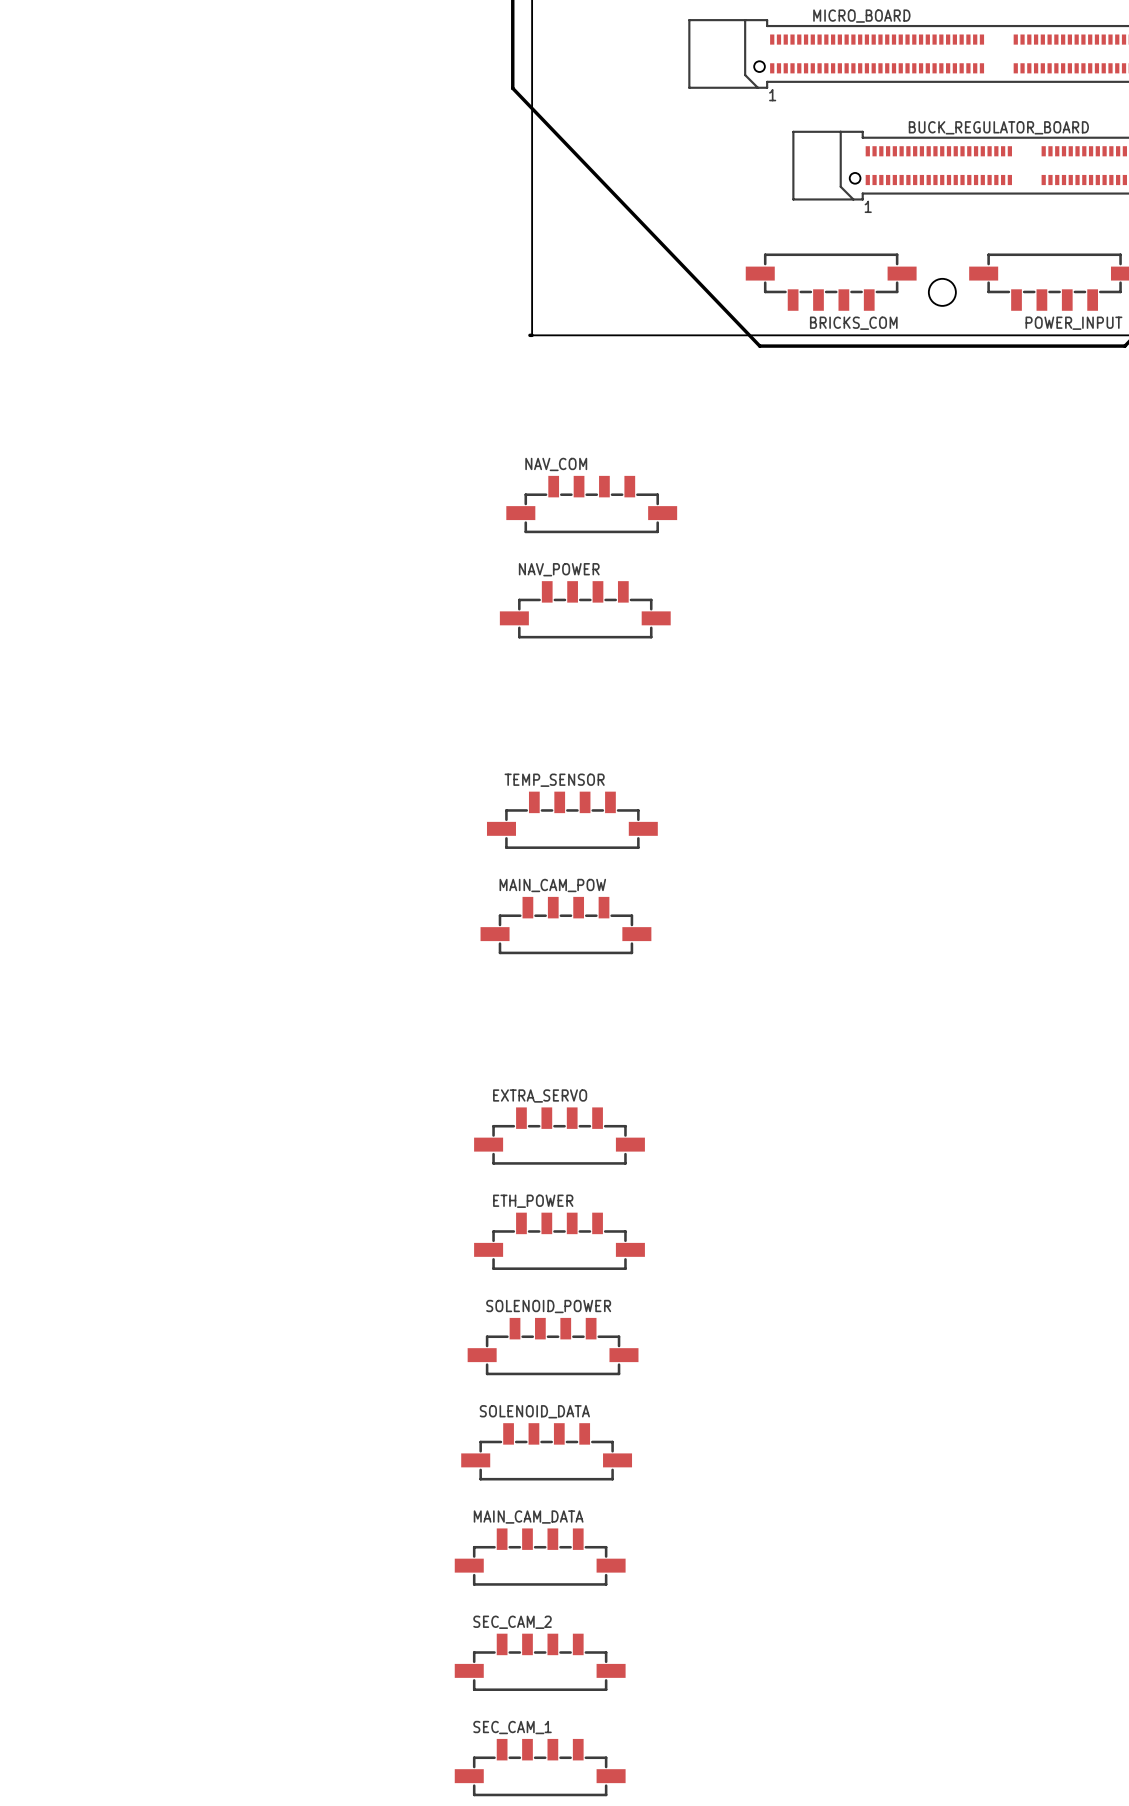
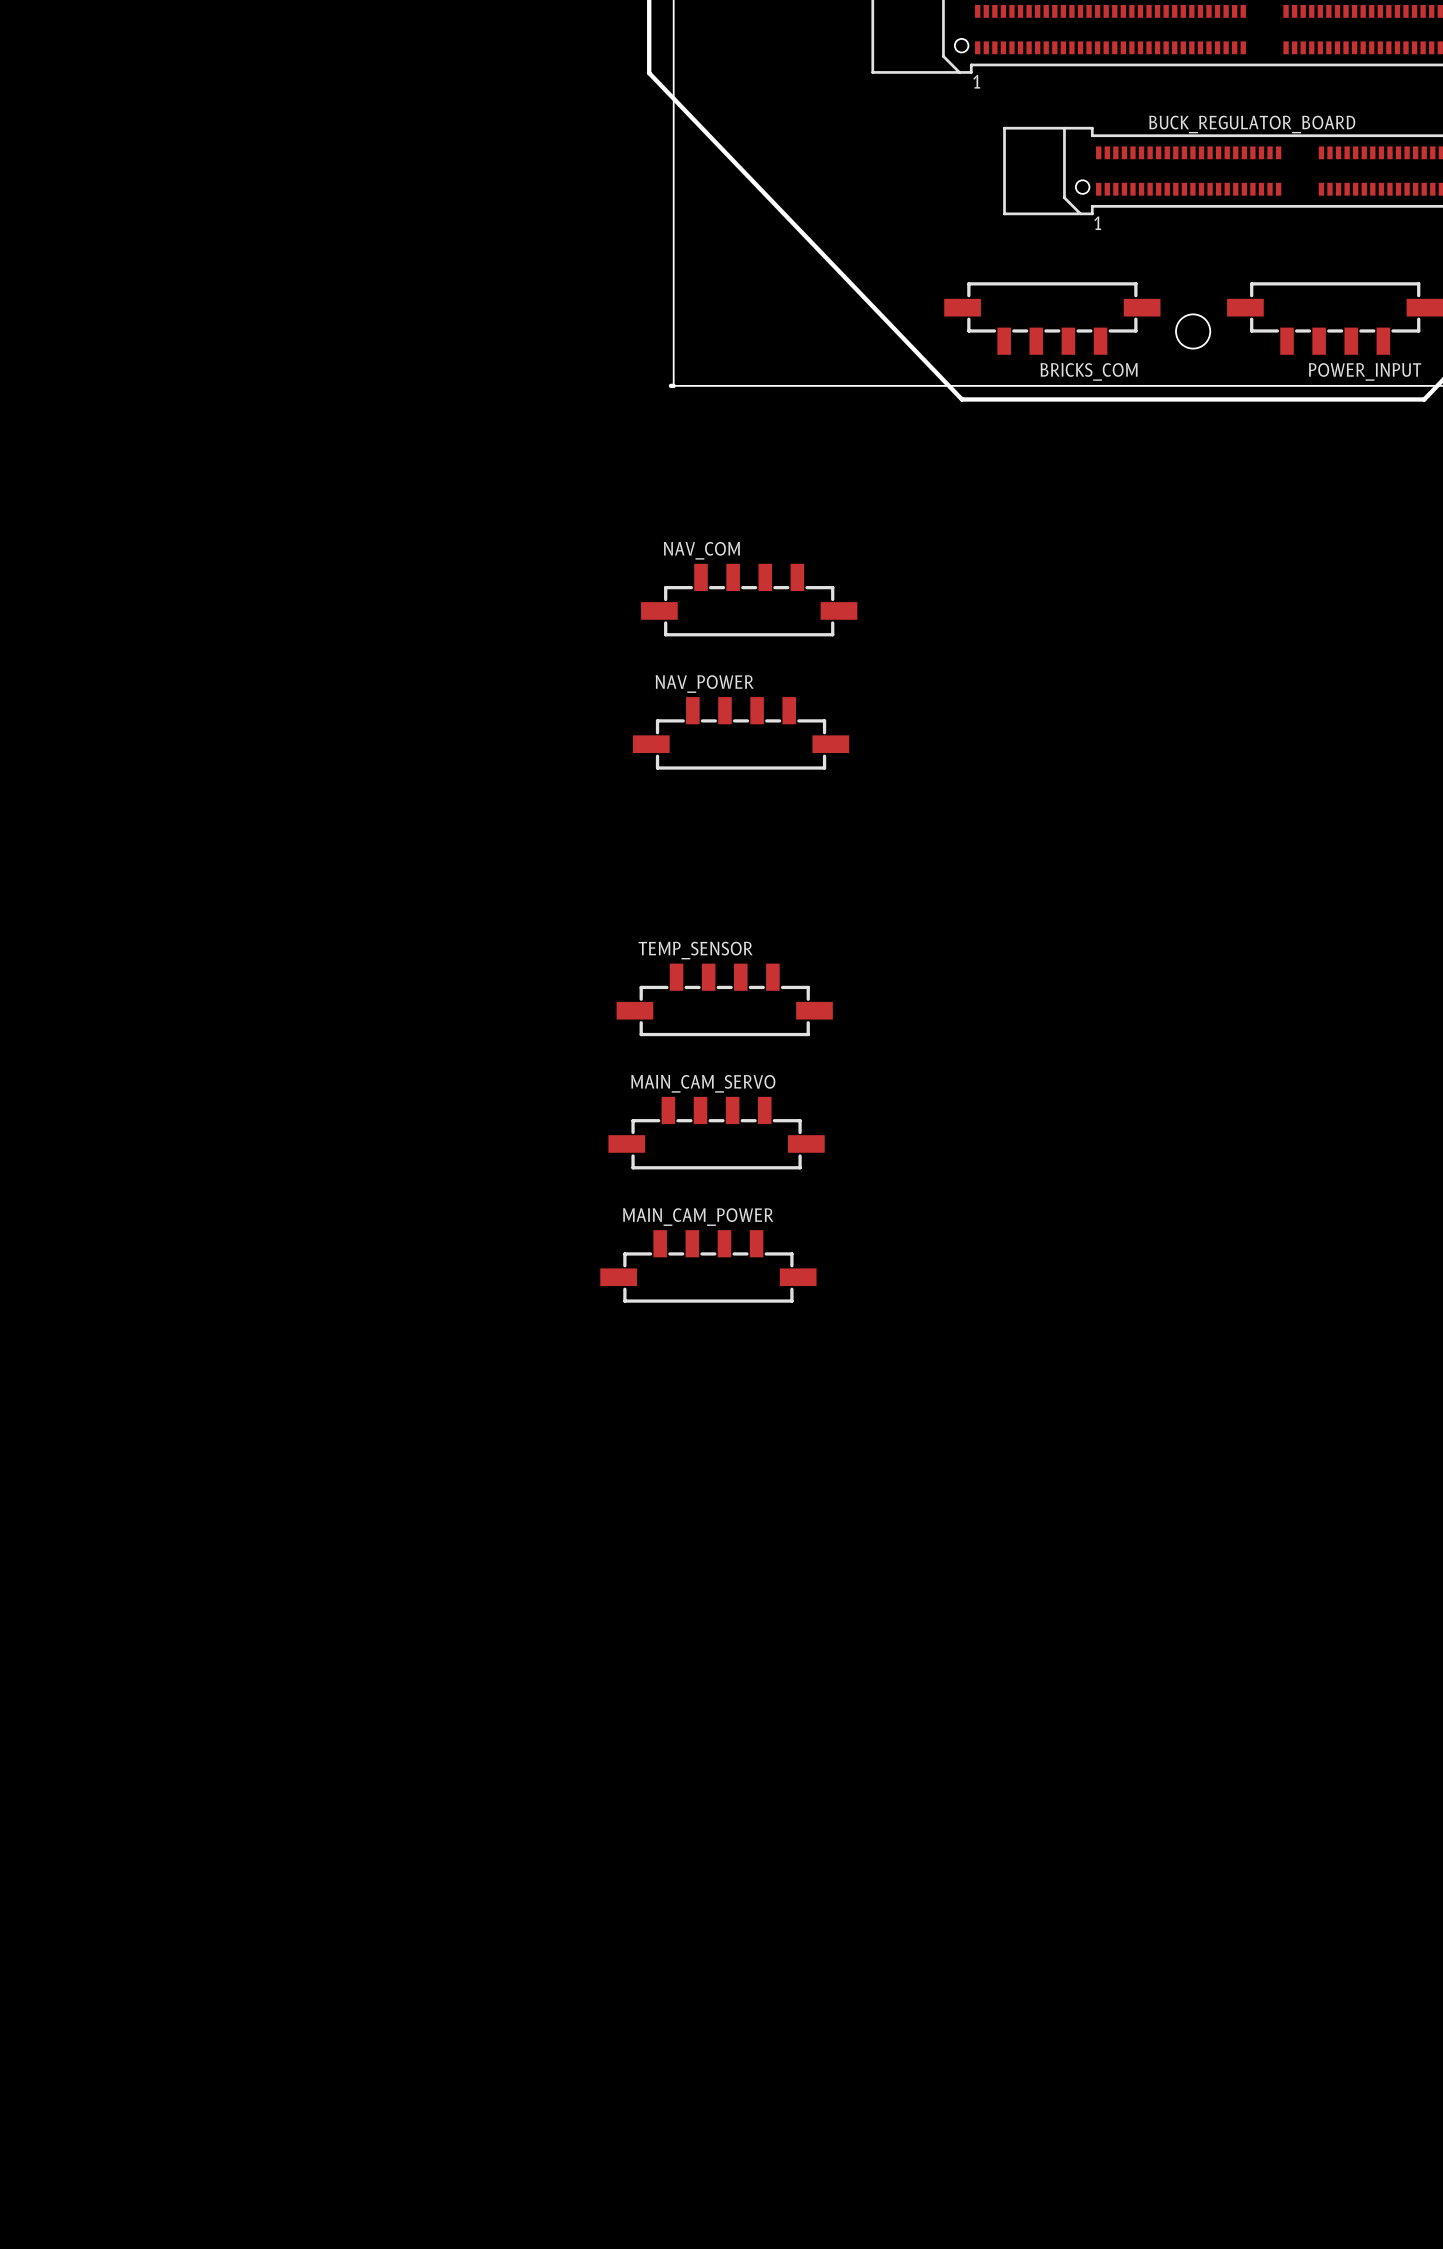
MAIN_CAM_POW name: MAIN_CAM_POW (552, 885) -> MAIN_CAM_SERVO (703, 1083)
MAIN_CAM_POWER: none -> (708, 1266)
EXTRA_SERVO: (559, 1136) -> none
ETH_POWER: (559, 1241) -> none
SOLENOID_POWER: (553, 1346) -> none
SOLENOID_DATA: (546, 1451) -> none
MAIN_CAM_DATA: (540, 1557) -> none
SEC_CAM_2: (540, 1662) -> none
SEC_CAM_1: (540, 1767) -> none

